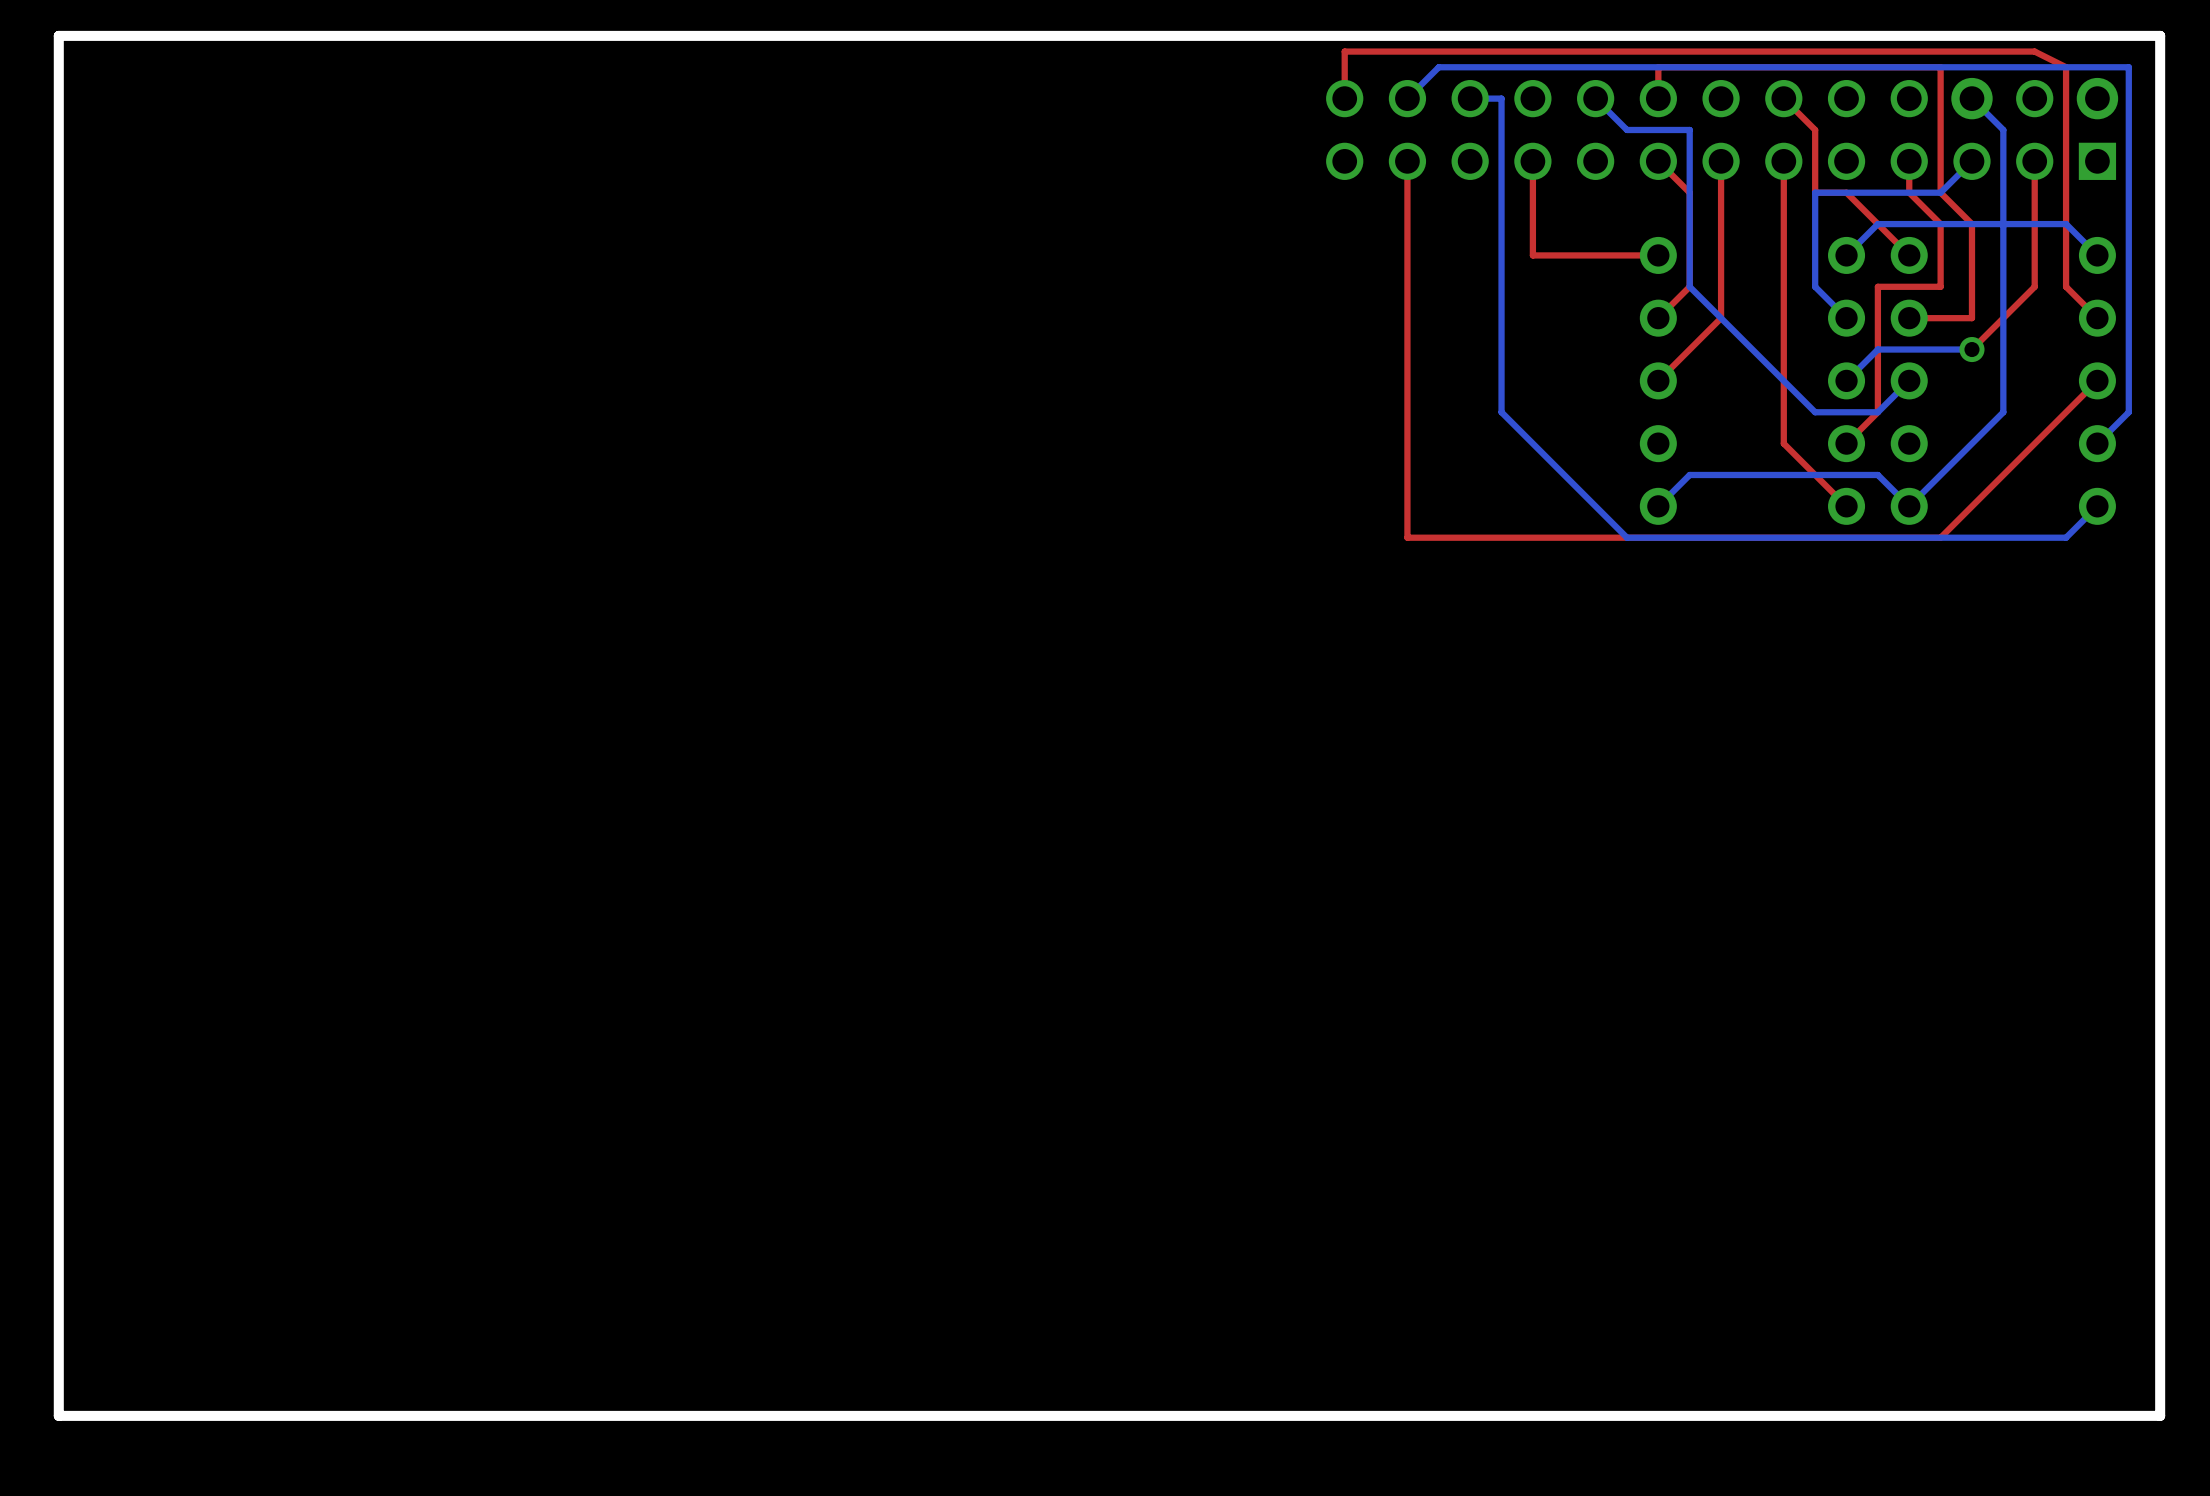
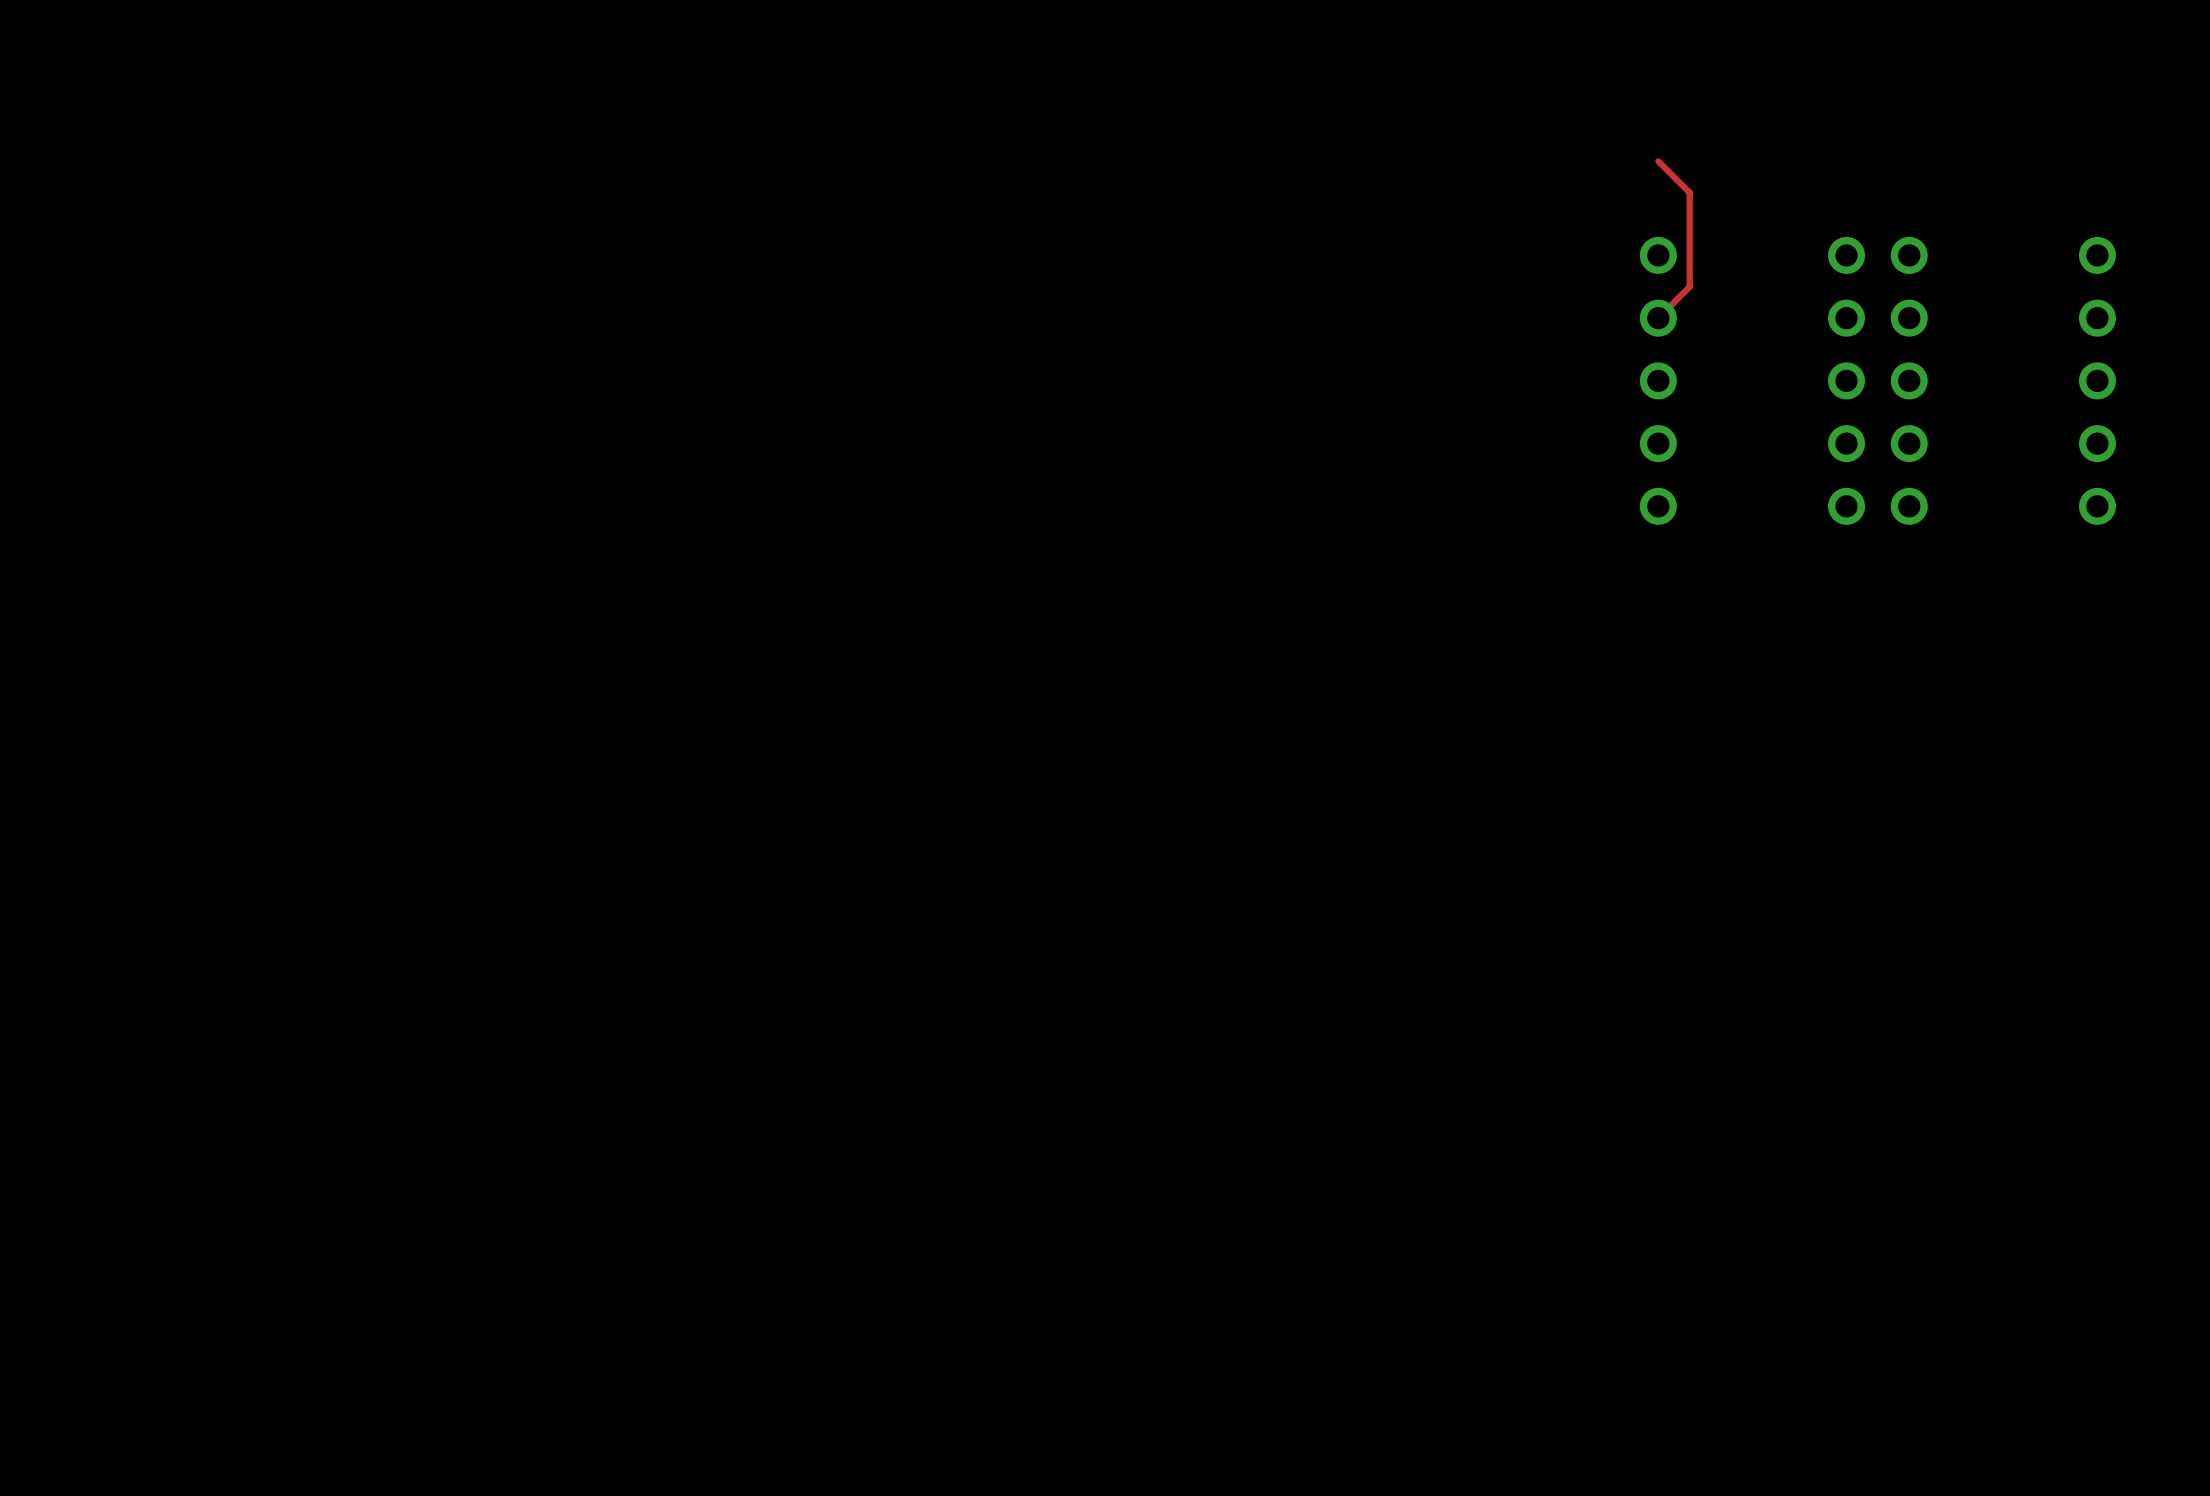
board edge: (2160, 35) (2160, 1415) (58, 1415) (58, 35) (2160, 35) -> none
top track: (1344, 98) (1344, 51) (2034, 51) (2066, 67) (2066, 286) (2097, 318) -> none
bottom track: (1407, 98) (1438, 67) (2128, 67) (2128, 412) (2097, 443) -> none
bottom track: (1470, 98) (1501, 98) (1501, 412) (1626, 537) (2066, 537) (2097, 506) -> none
bottom track: (1595, 98) (1626, 129) (1689, 129) (1689, 286) (1815, 412) (1877, 412) (1909, 380) -> none
top track: (1658, 98) (1658, 67) (1940, 67) (1940, 192) (1971, 224) (1971, 318) (1909, 318) -> none
top track: (1783, 98) (1815, 129) (1815, 192) (1846, 192) (1909, 255) -> none
bottom track: (1971, 98) (2003, 129) (2003, 412) (1909, 506) (1877, 474) (1689, 474) (1658, 506) -> none
part: (1722, 128) -> none
top track: (1407, 161) (1407, 537) (1940, 537) (2097, 380) -> none
top track: (1532, 161) (1532, 255) (1658, 255) -> none
top track: (1721, 161) (1721, 318) (1658, 380) -> none
top track: (1783, 161) (1783, 443) (1846, 506) -> none
top track: (1909, 161) (1909, 192) (1940, 224) (1940, 286) (1877, 286) (1877, 412) (1846, 443) -> none
bottom track: (1971, 161) (1940, 192) (1815, 192) (1815, 286) (1846, 318) -> none
top track: (2034, 161) (2034, 286) (1971, 349) -> none
bottom track: (2097, 255) (2066, 224) (1877, 224) (1846, 255) -> none
bottom track: (1971, 349) (1877, 349) (1846, 380) -> none
via: (1971, 349) -> none

